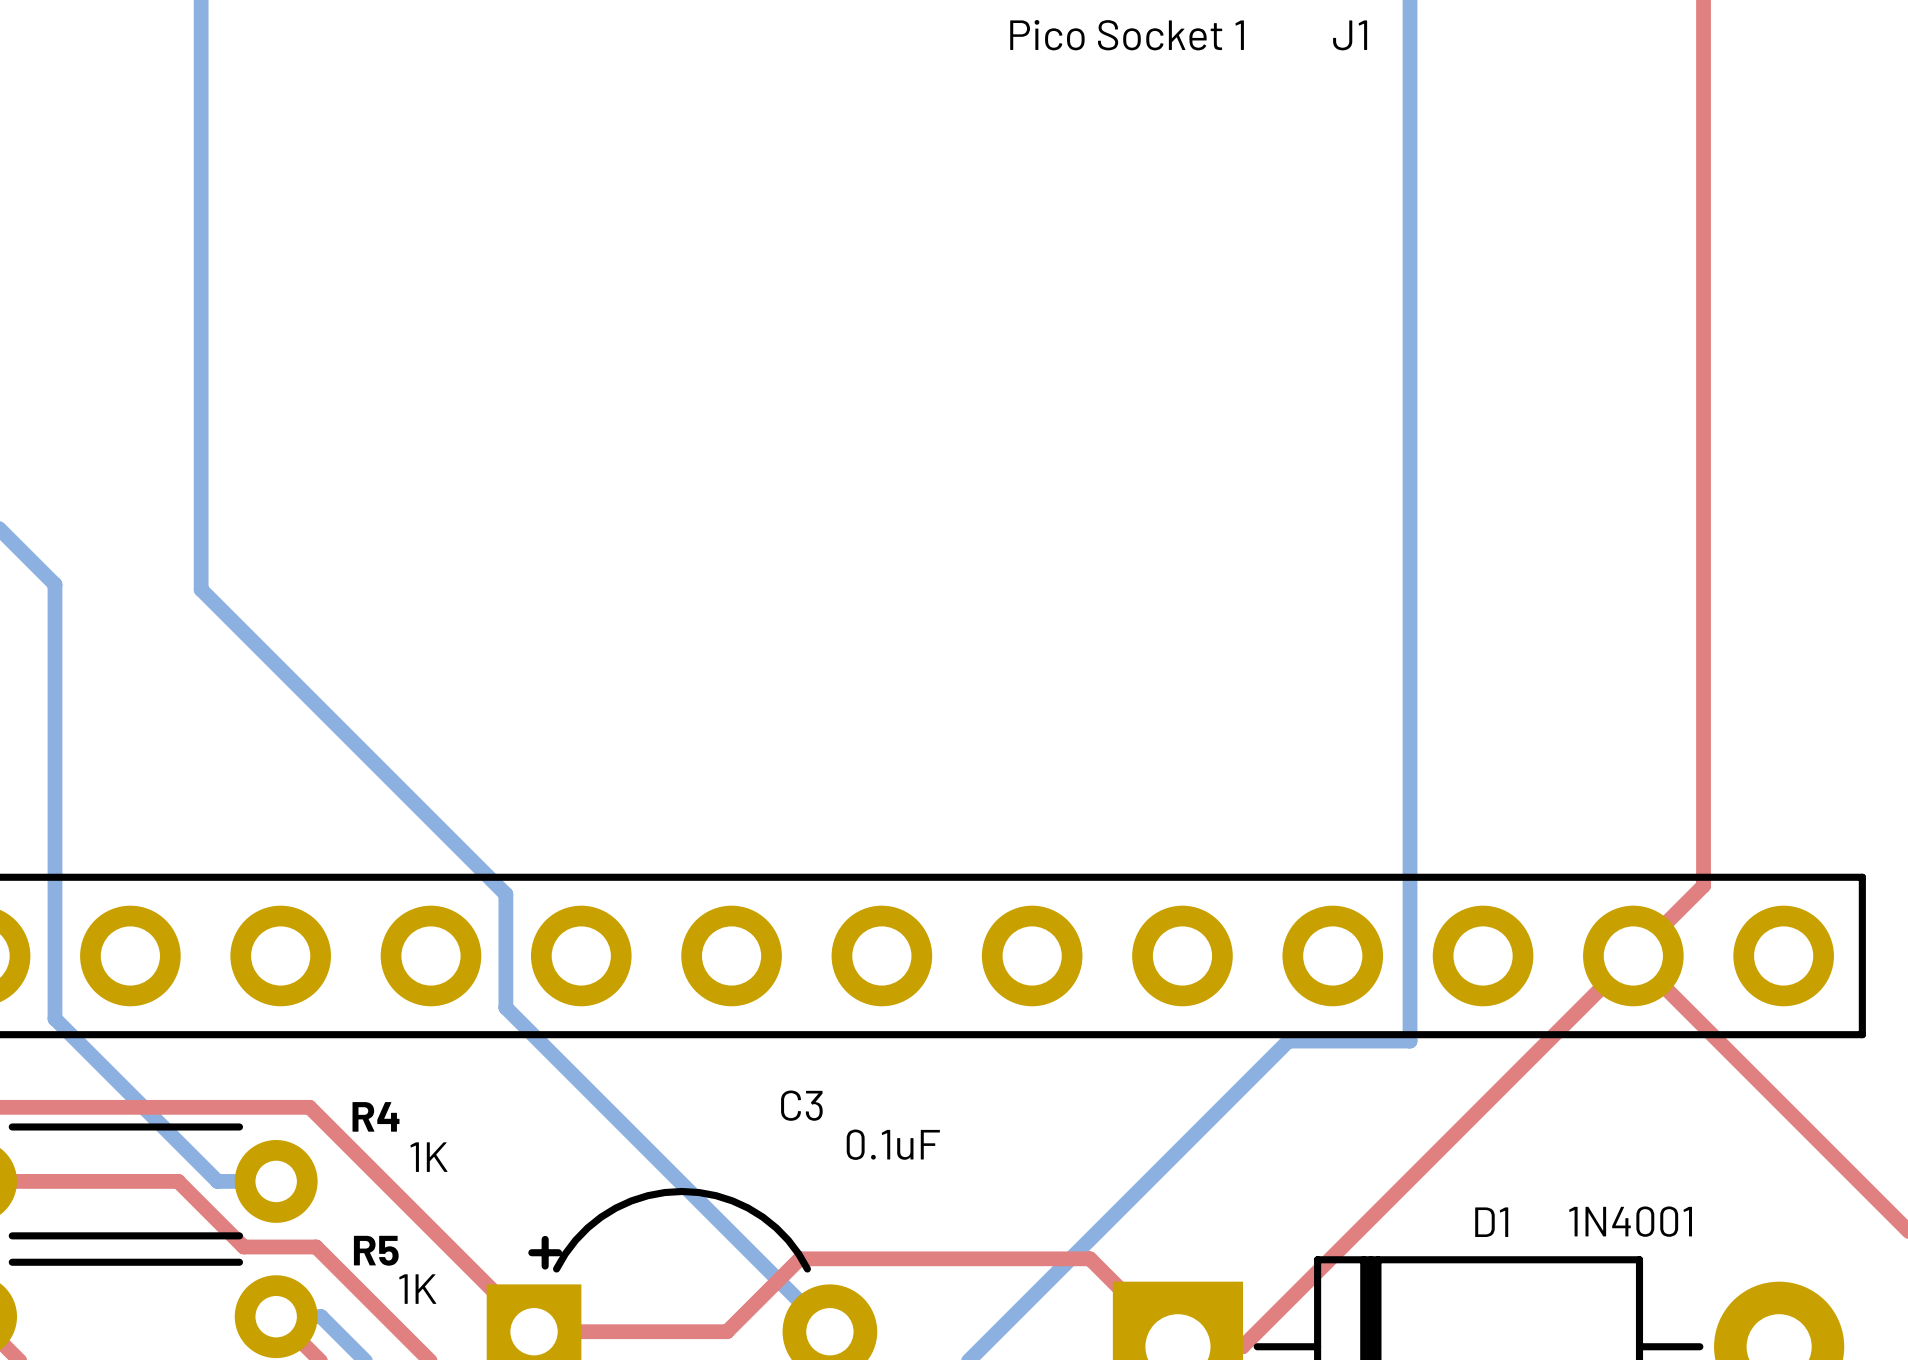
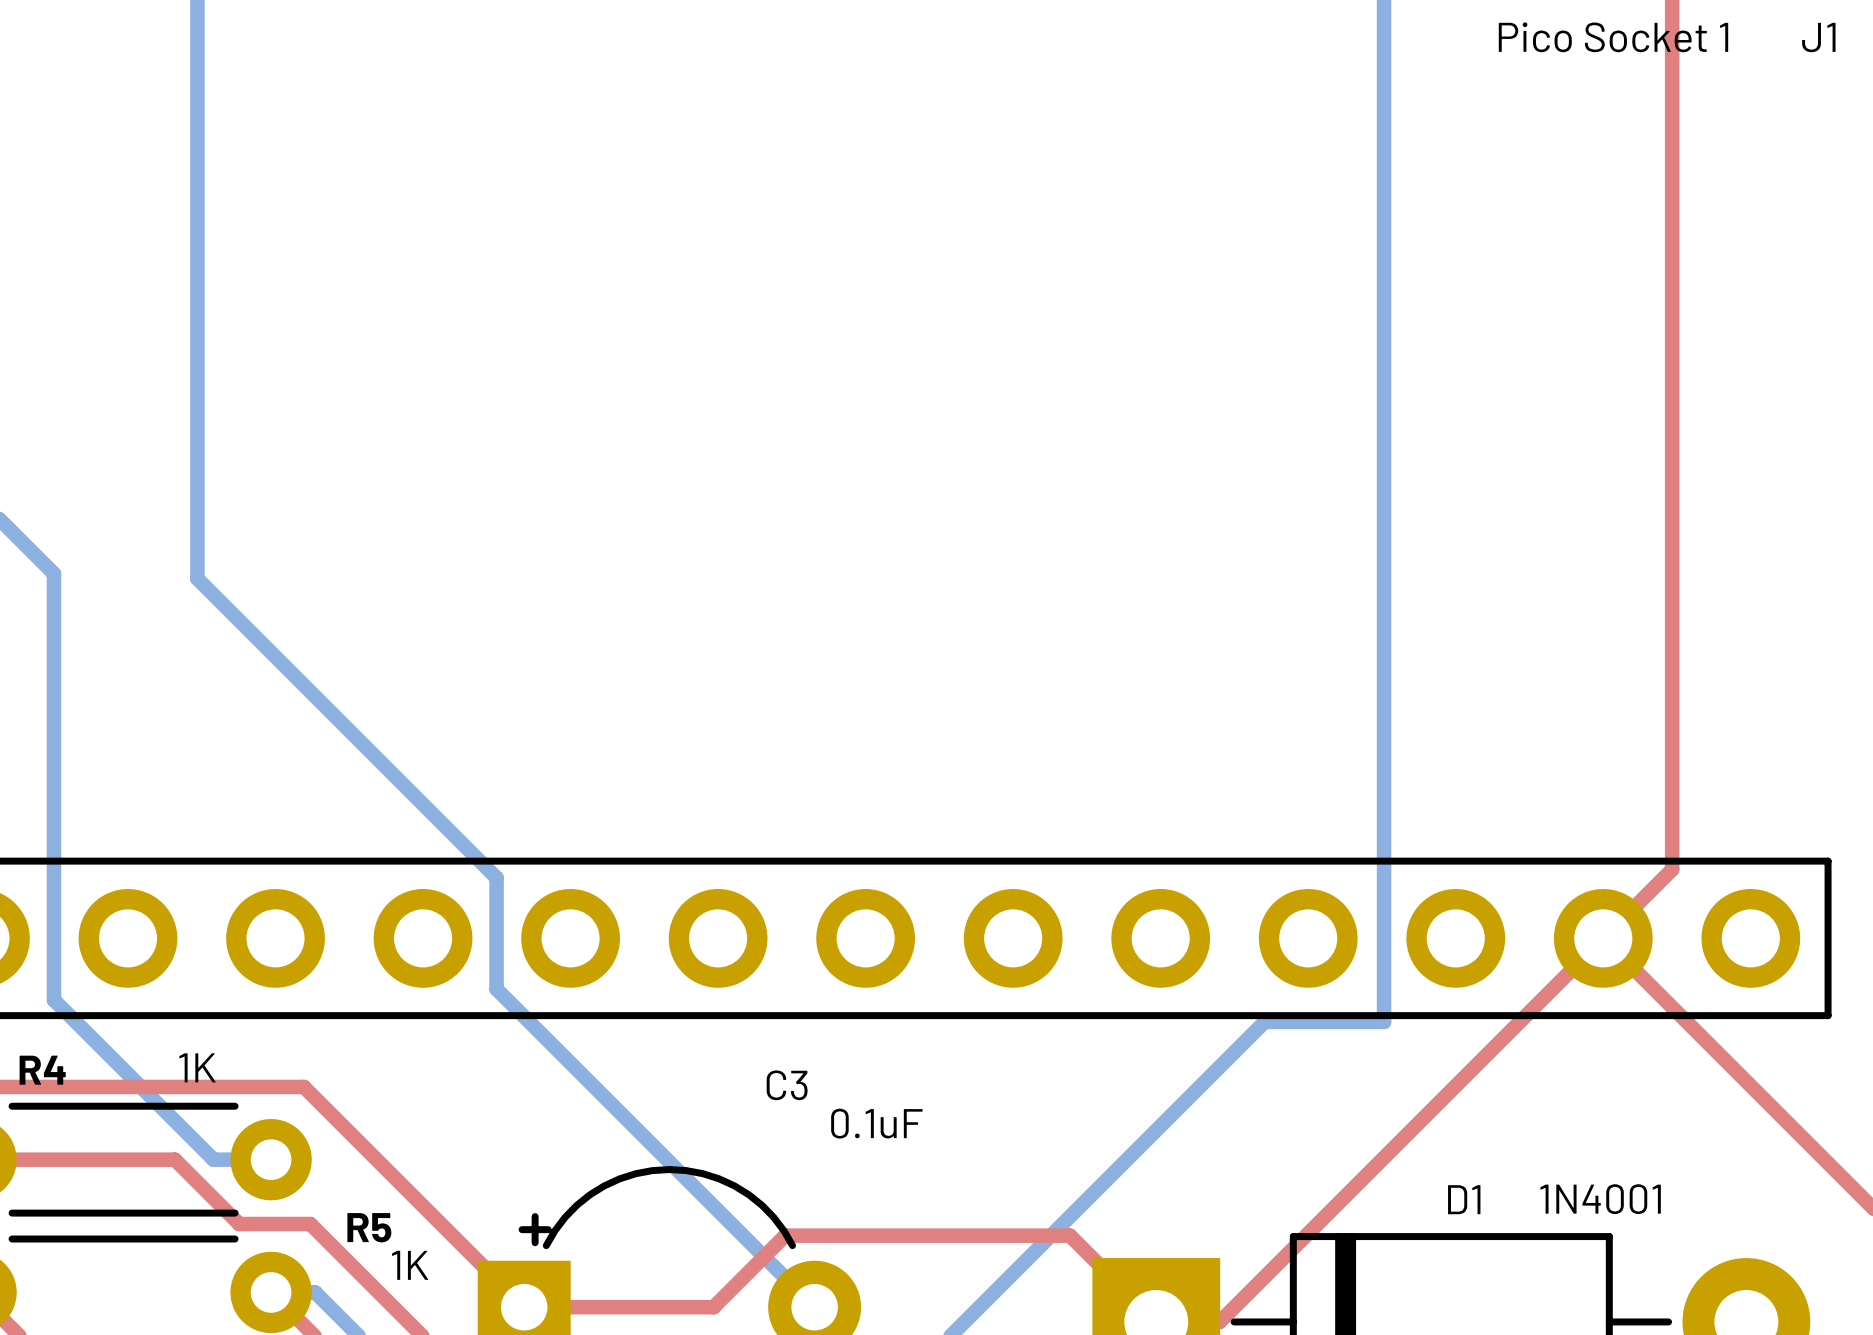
J1 value position: Pico Socket 1 (1127, 35) -> Pico Socket 1 (1613, 37)
J1 name position: J1 (1350, 35) -> J1 (1818, 37)
R4 name position: R4 (376, 1116) -> R4 (42, 1070)
R4 value position: 1K (429, 1157) -> 1K (197, 1067)

